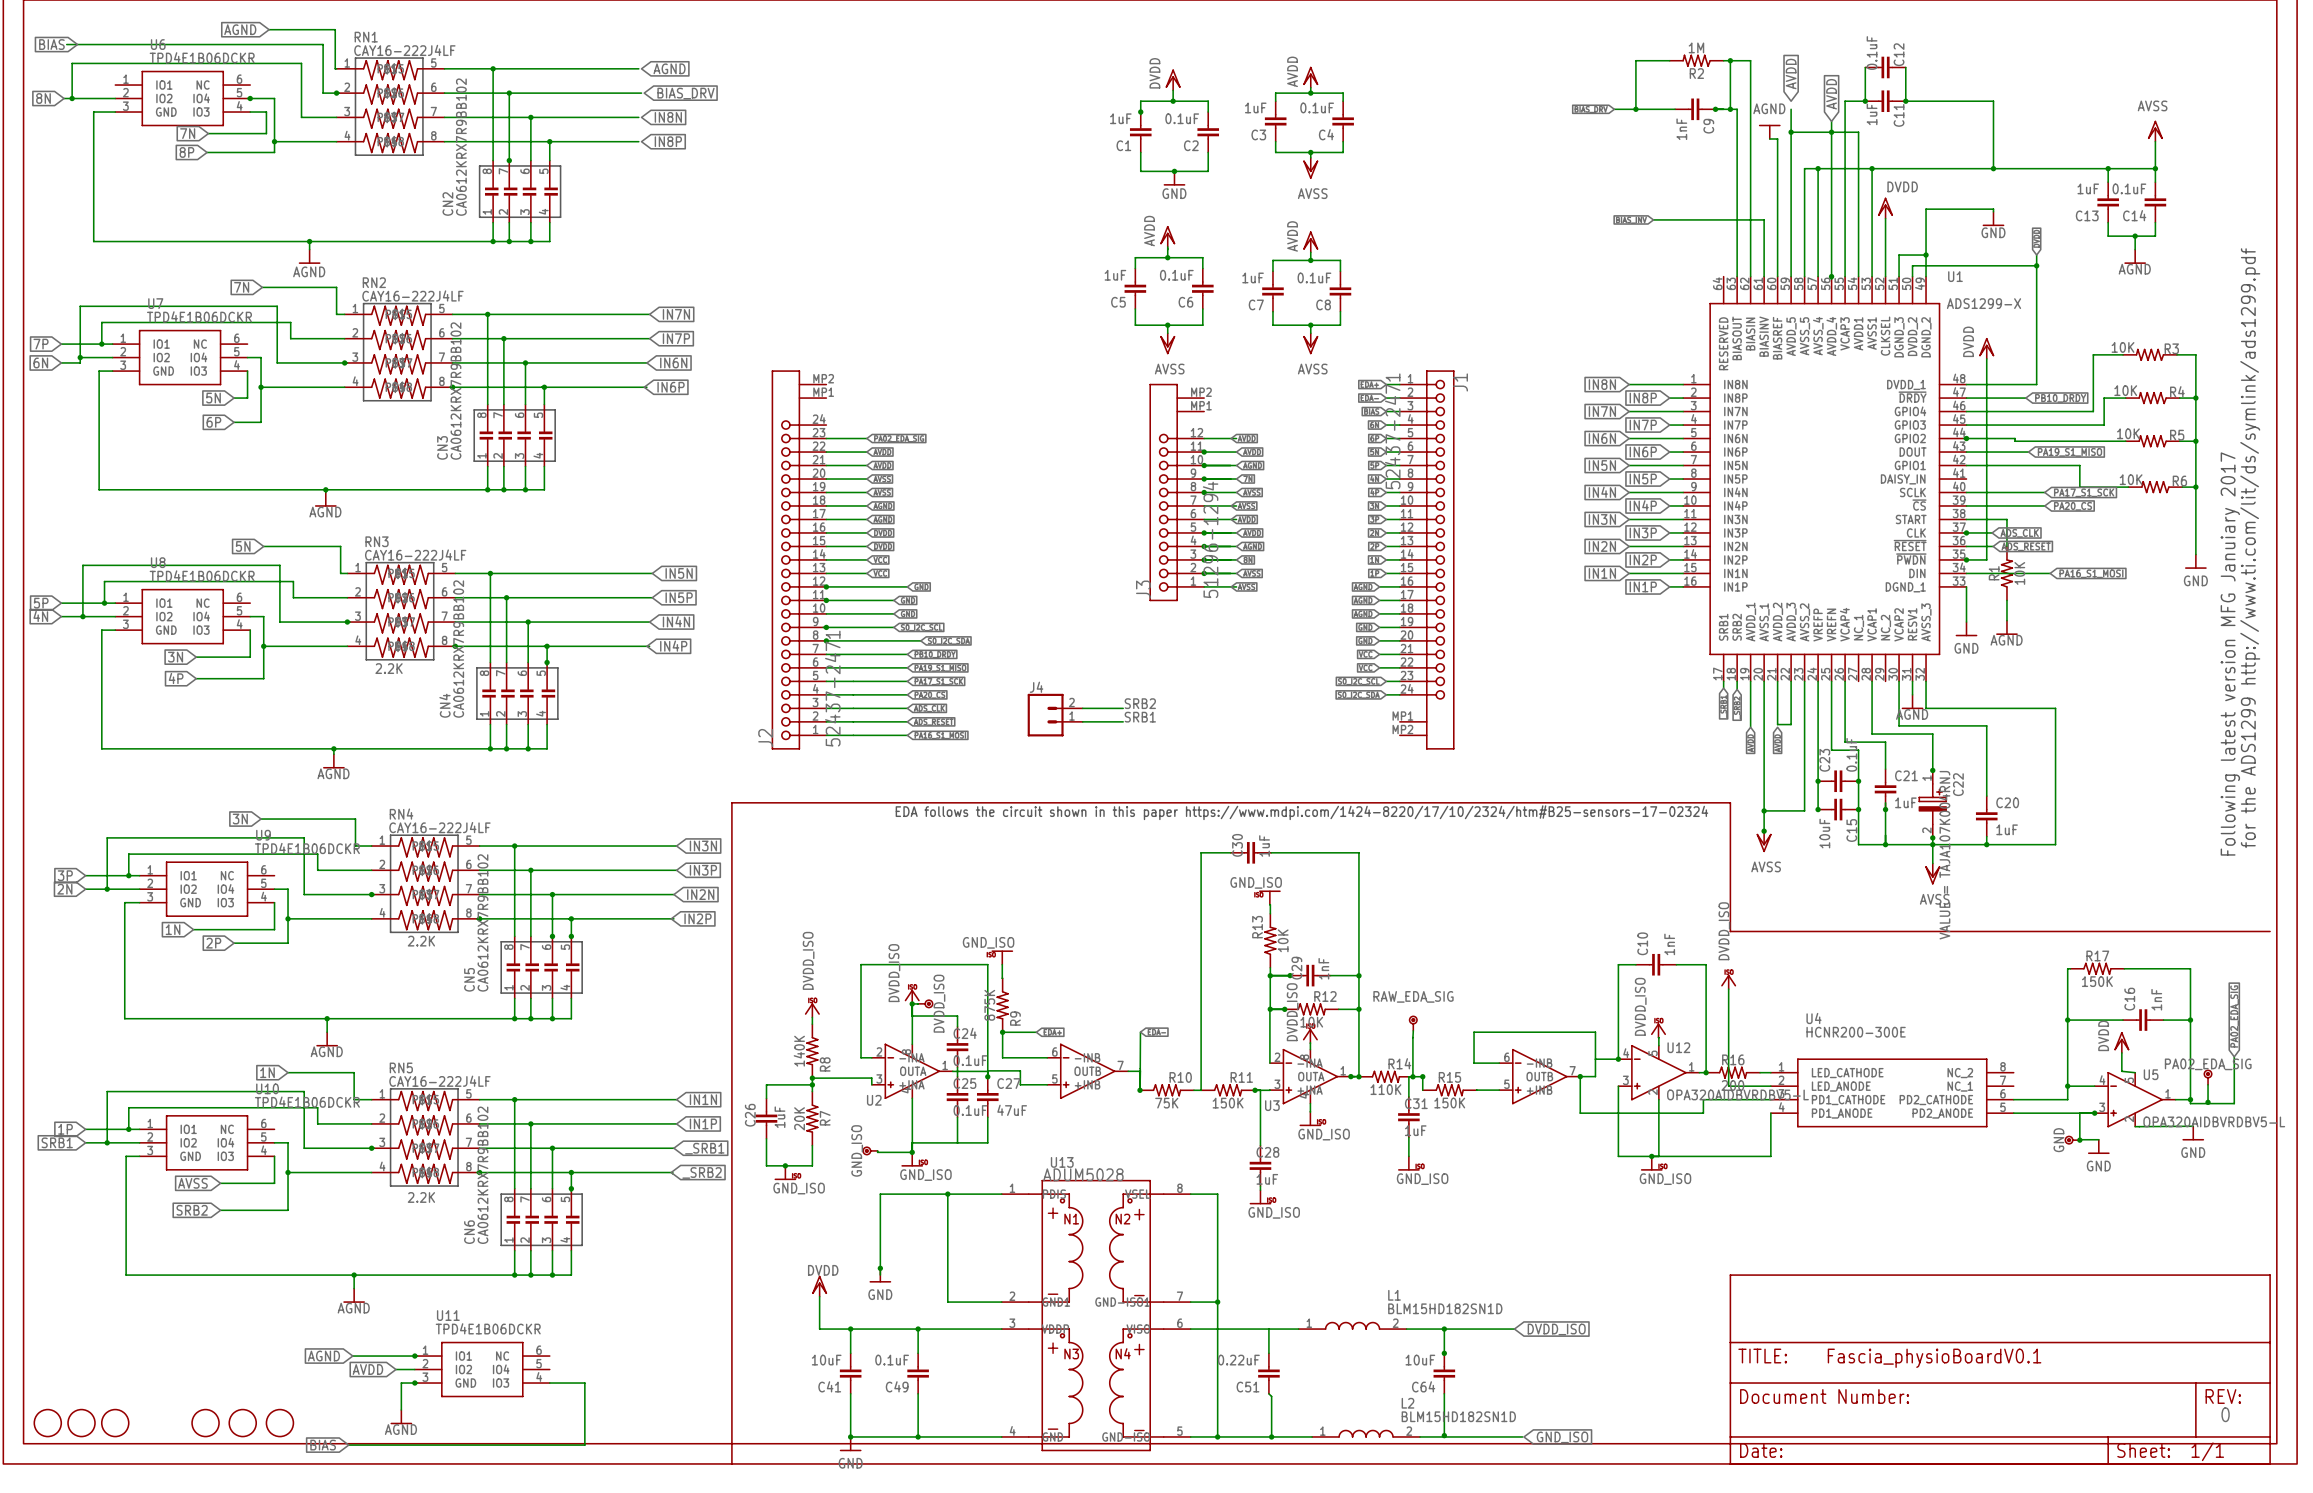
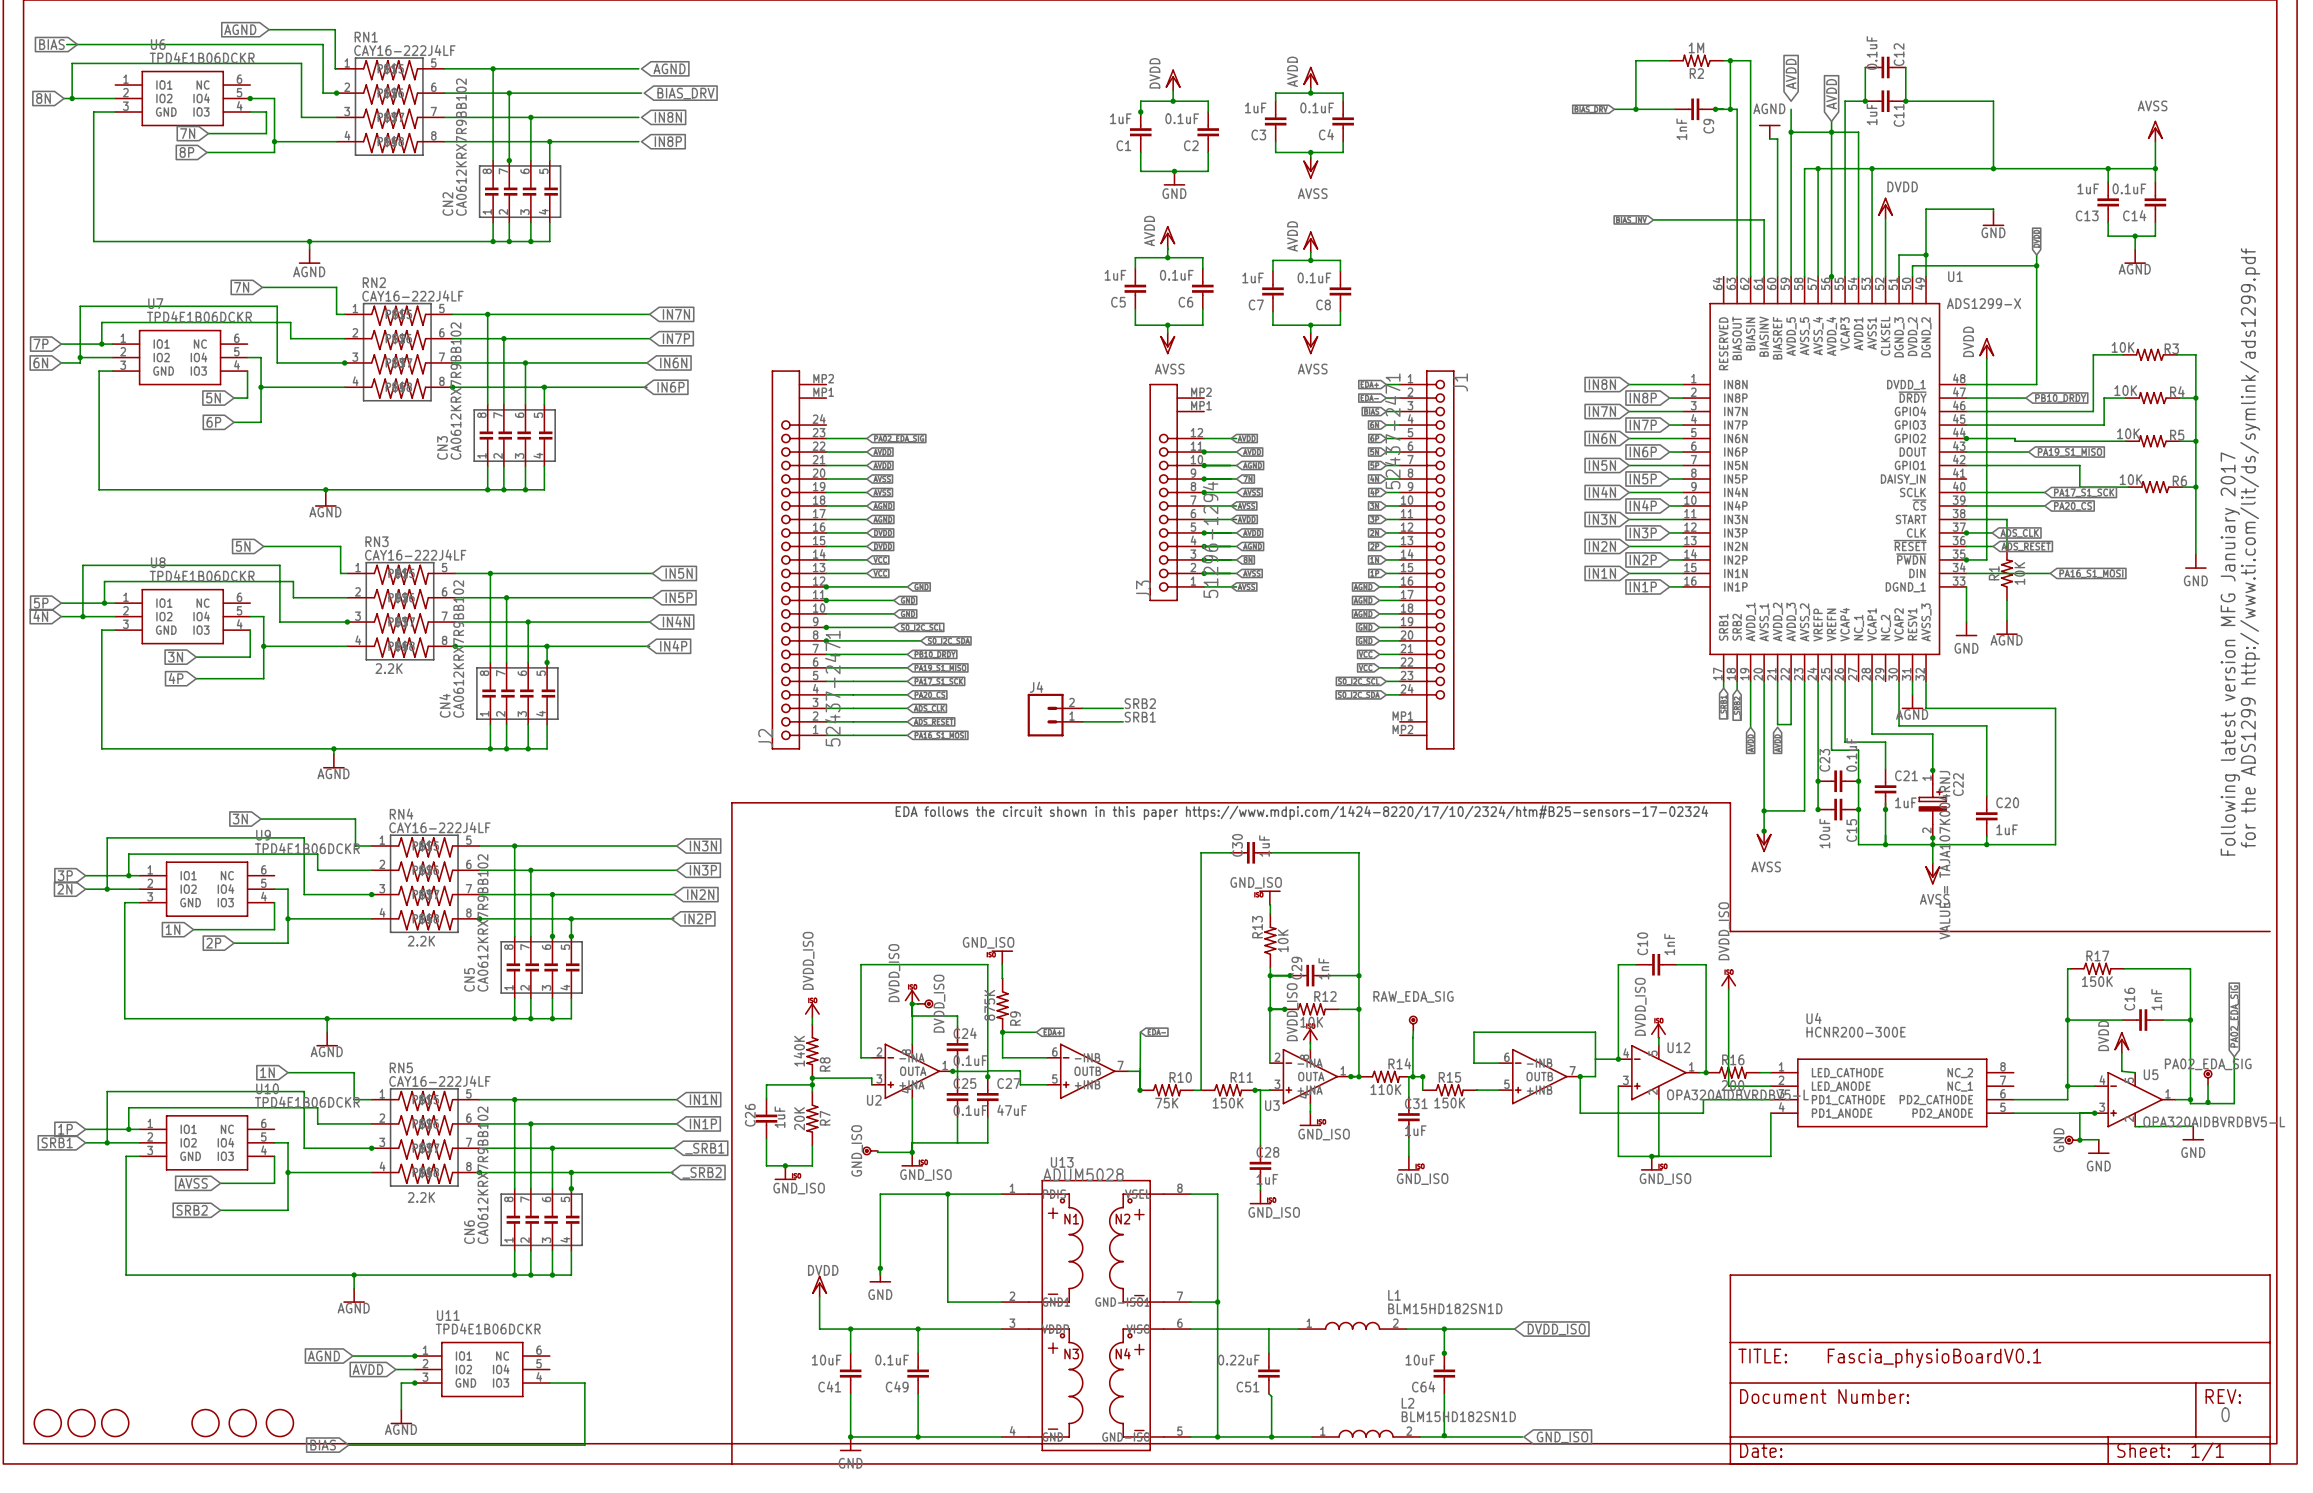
junction: none -> (952, 1071)

